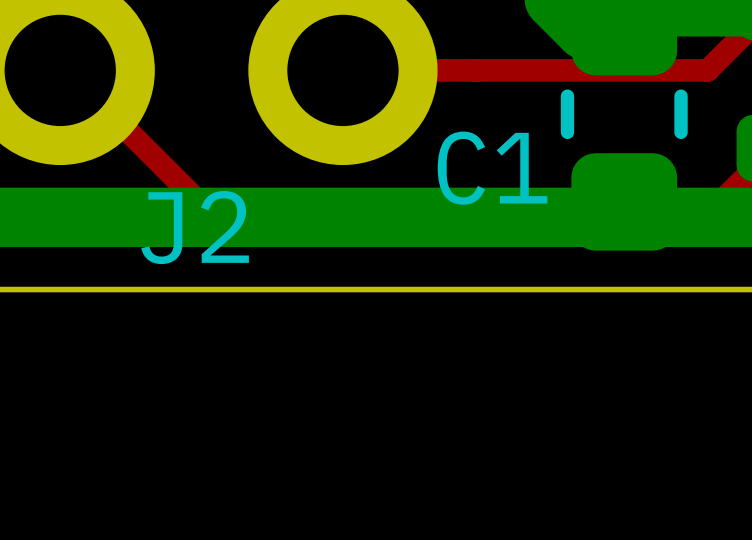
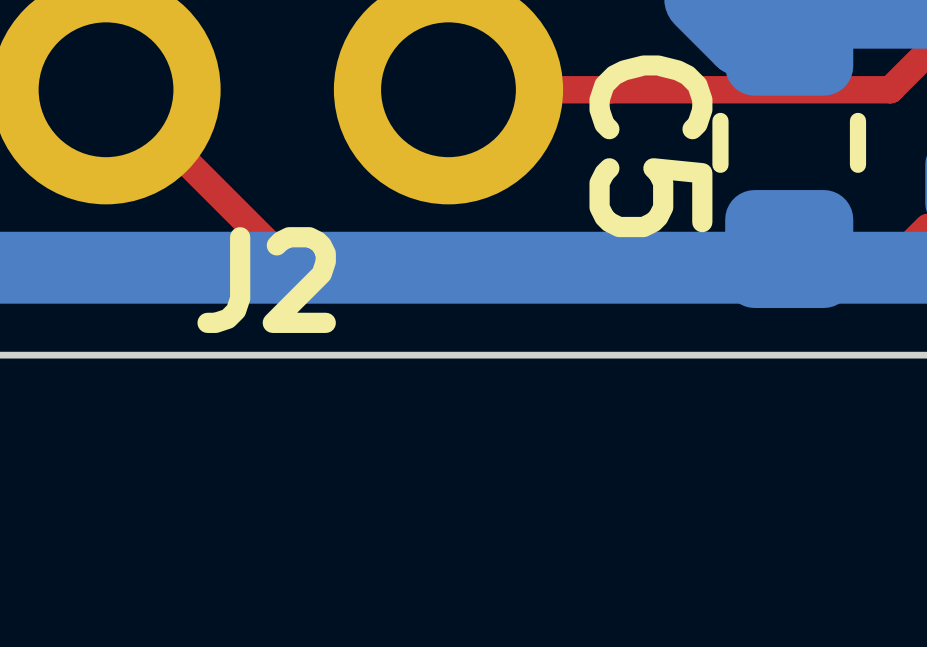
C1 name: C1 (492, 168) -> C5 (650, 146)

